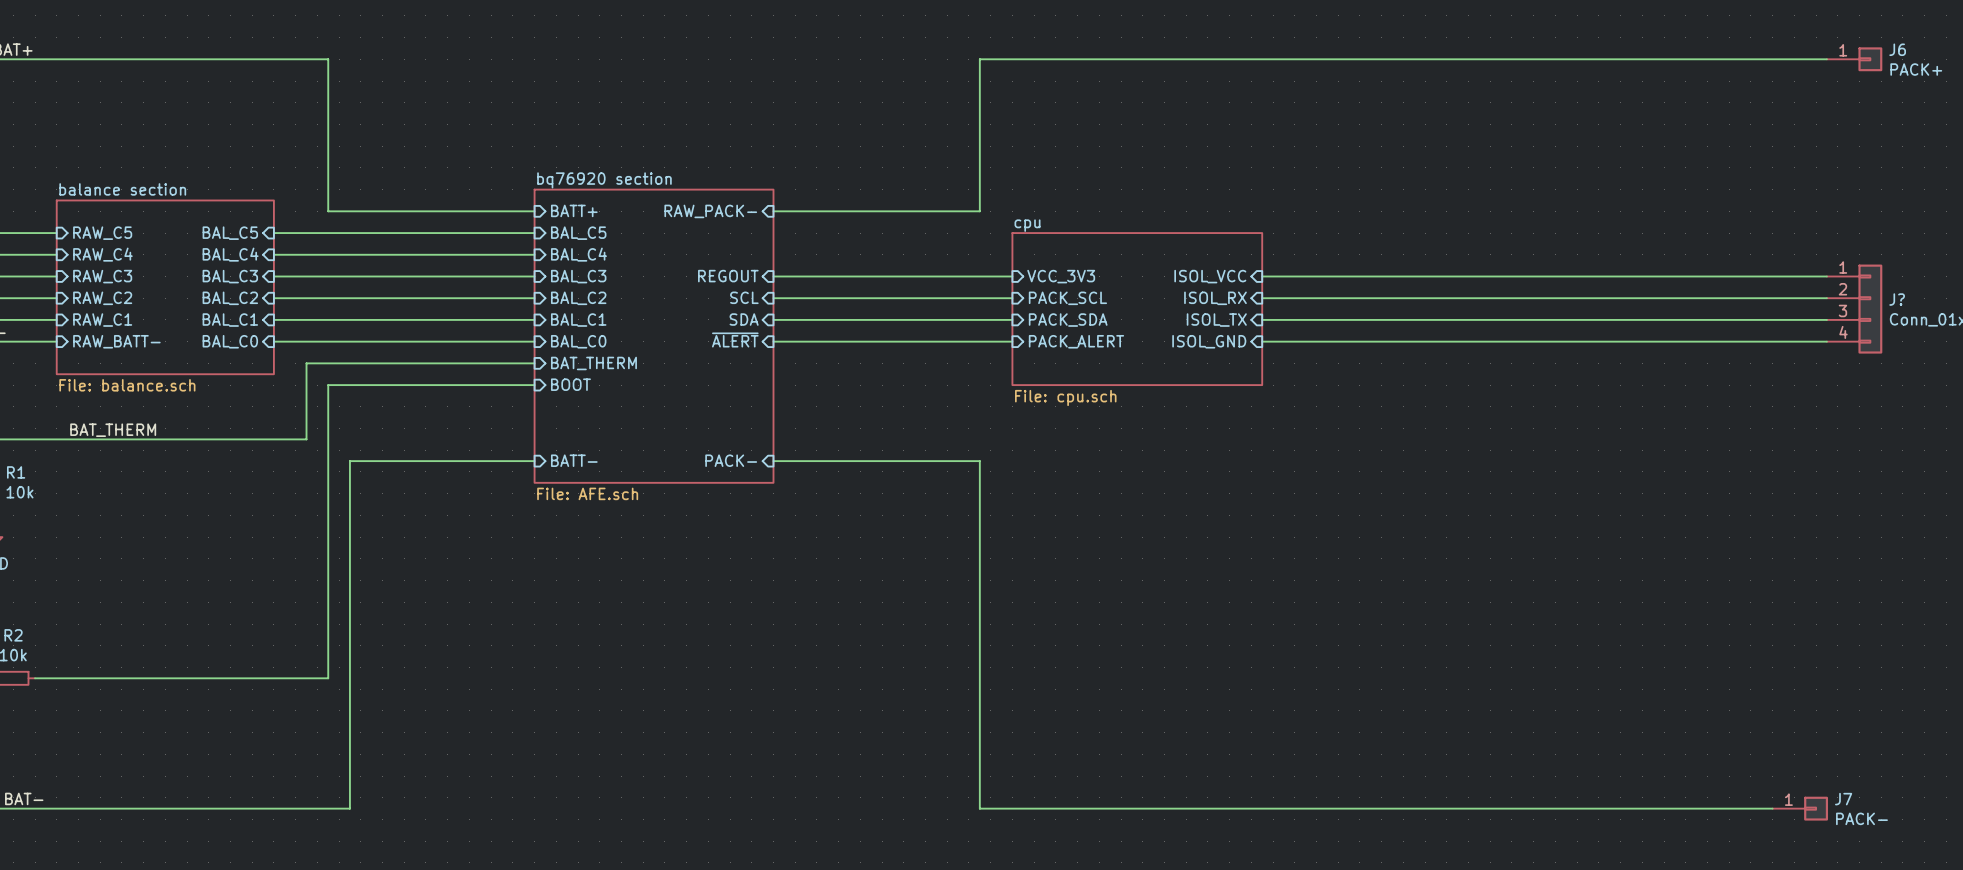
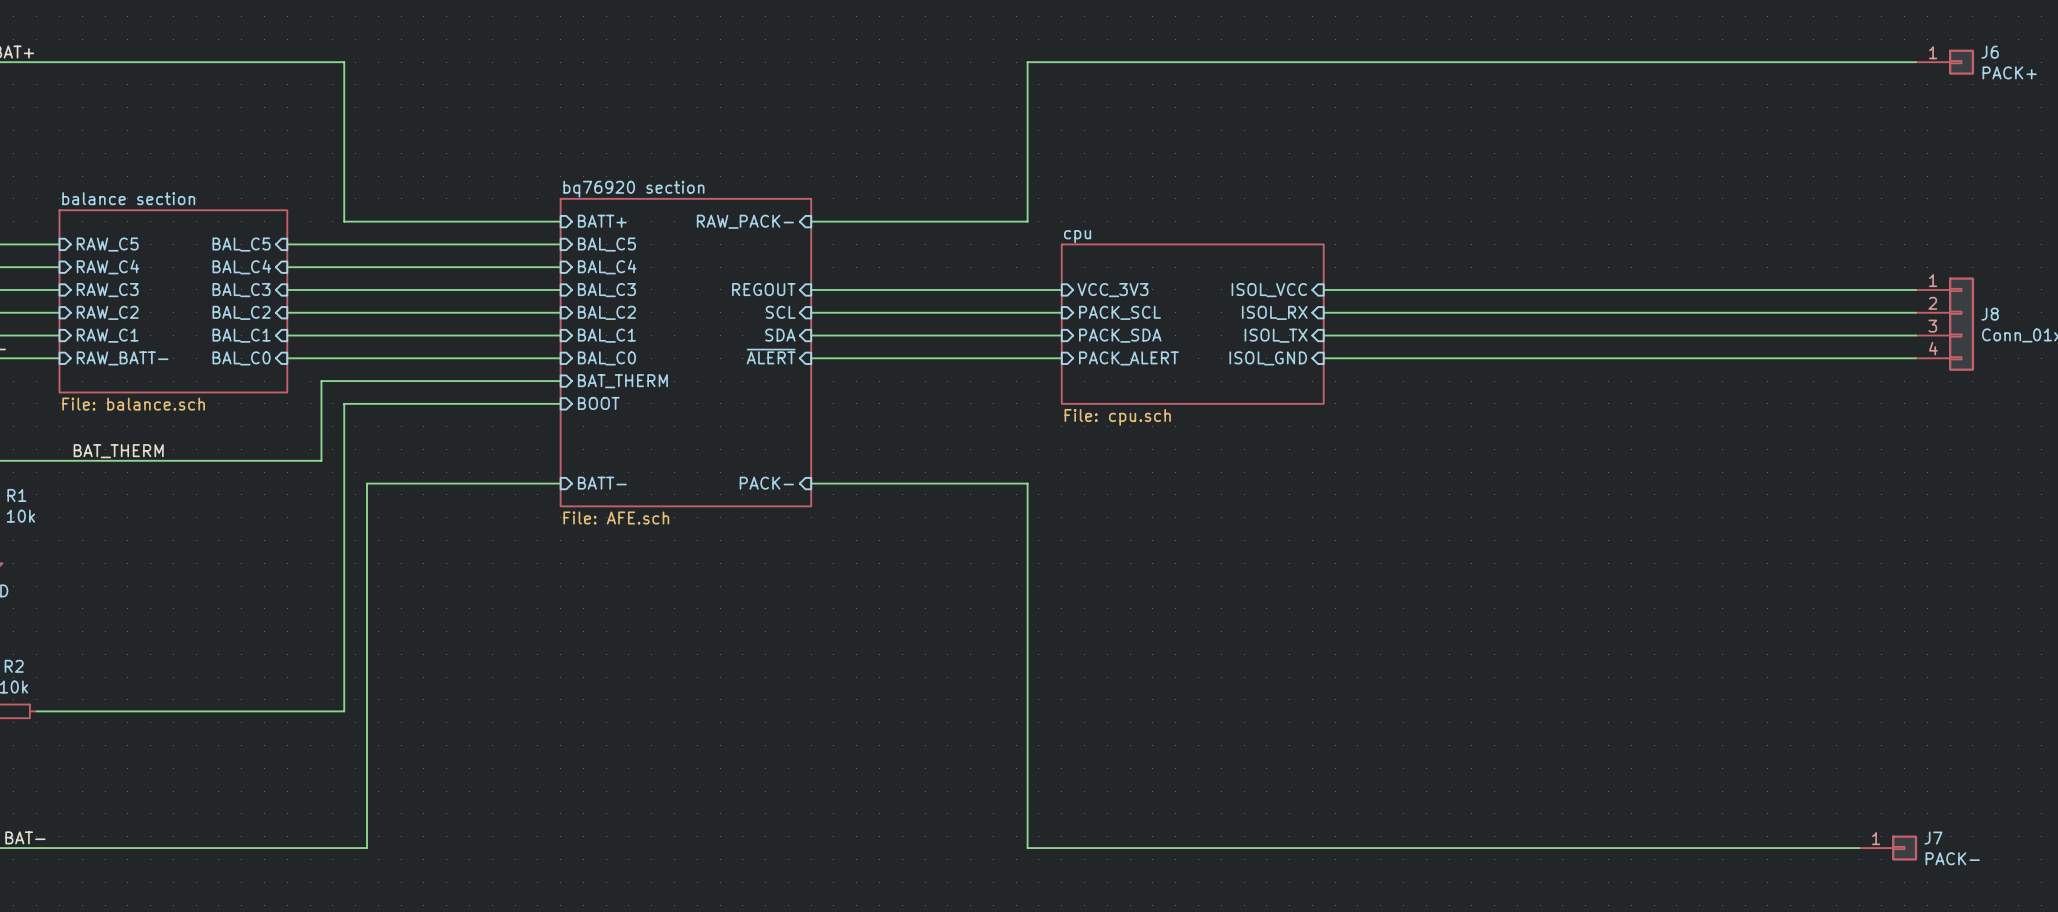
J? name: J? (1897, 299) -> J8 (1990, 314)

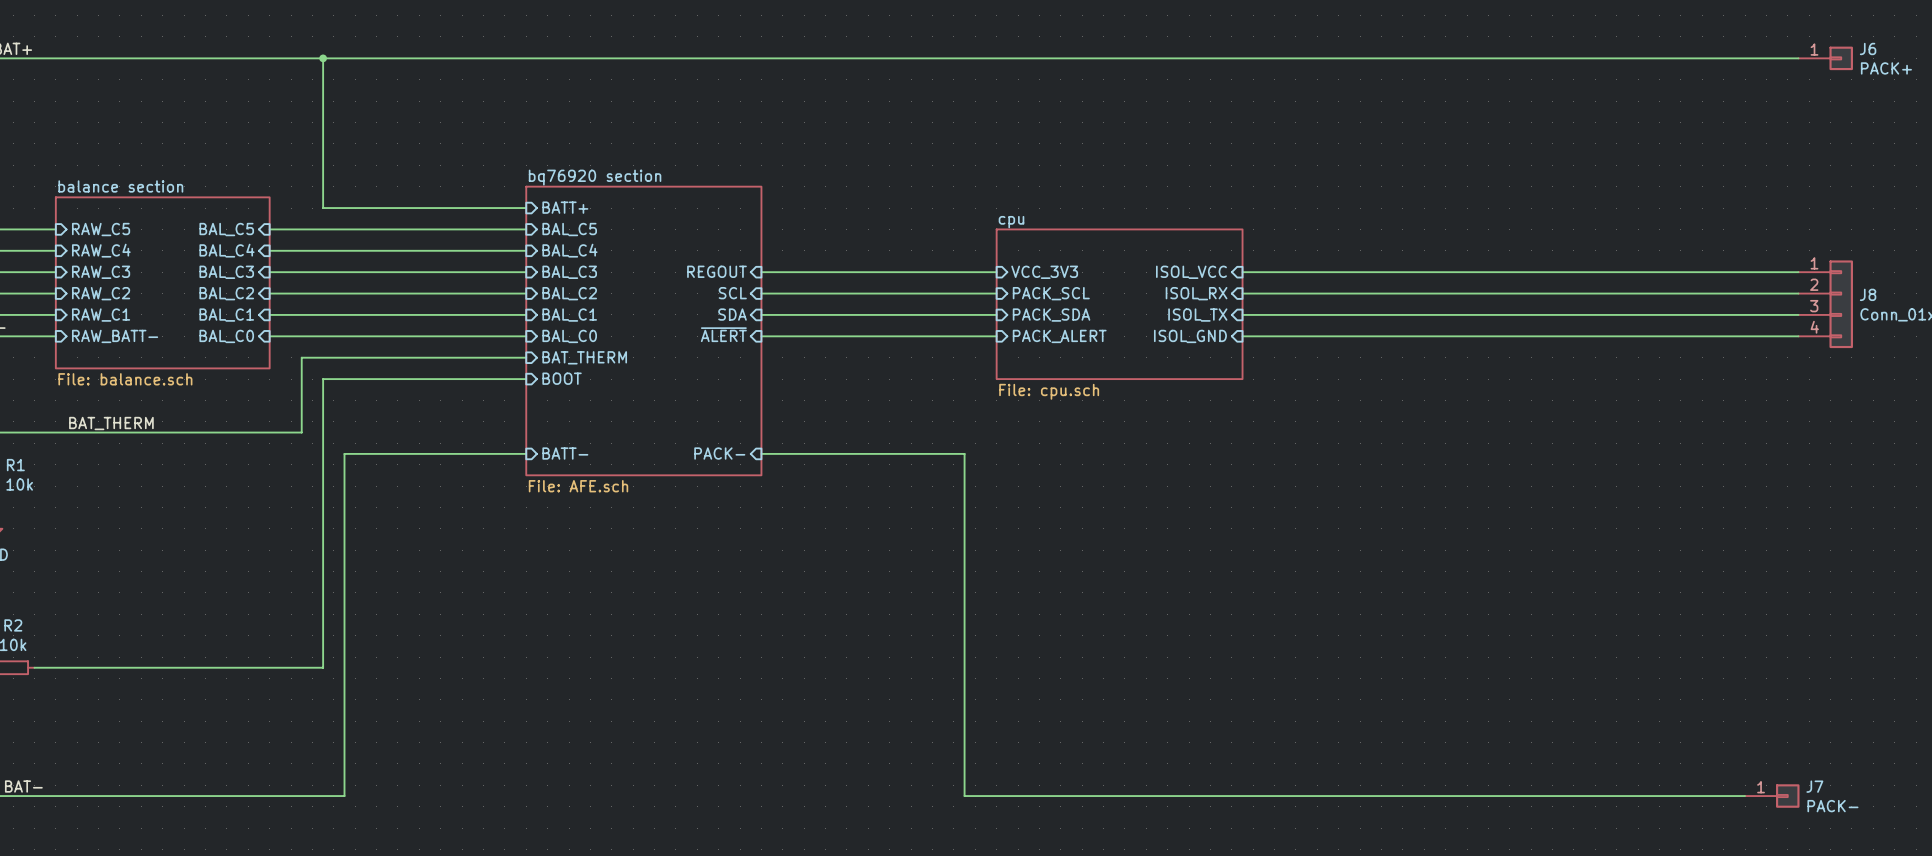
junction: none -> (323, 58)
wire: (1027, 62) (1027, 221) (811, 221) -> (964, 58) (323, 58)
sheet pin: RAW_PACK- (745, 221) -> none

